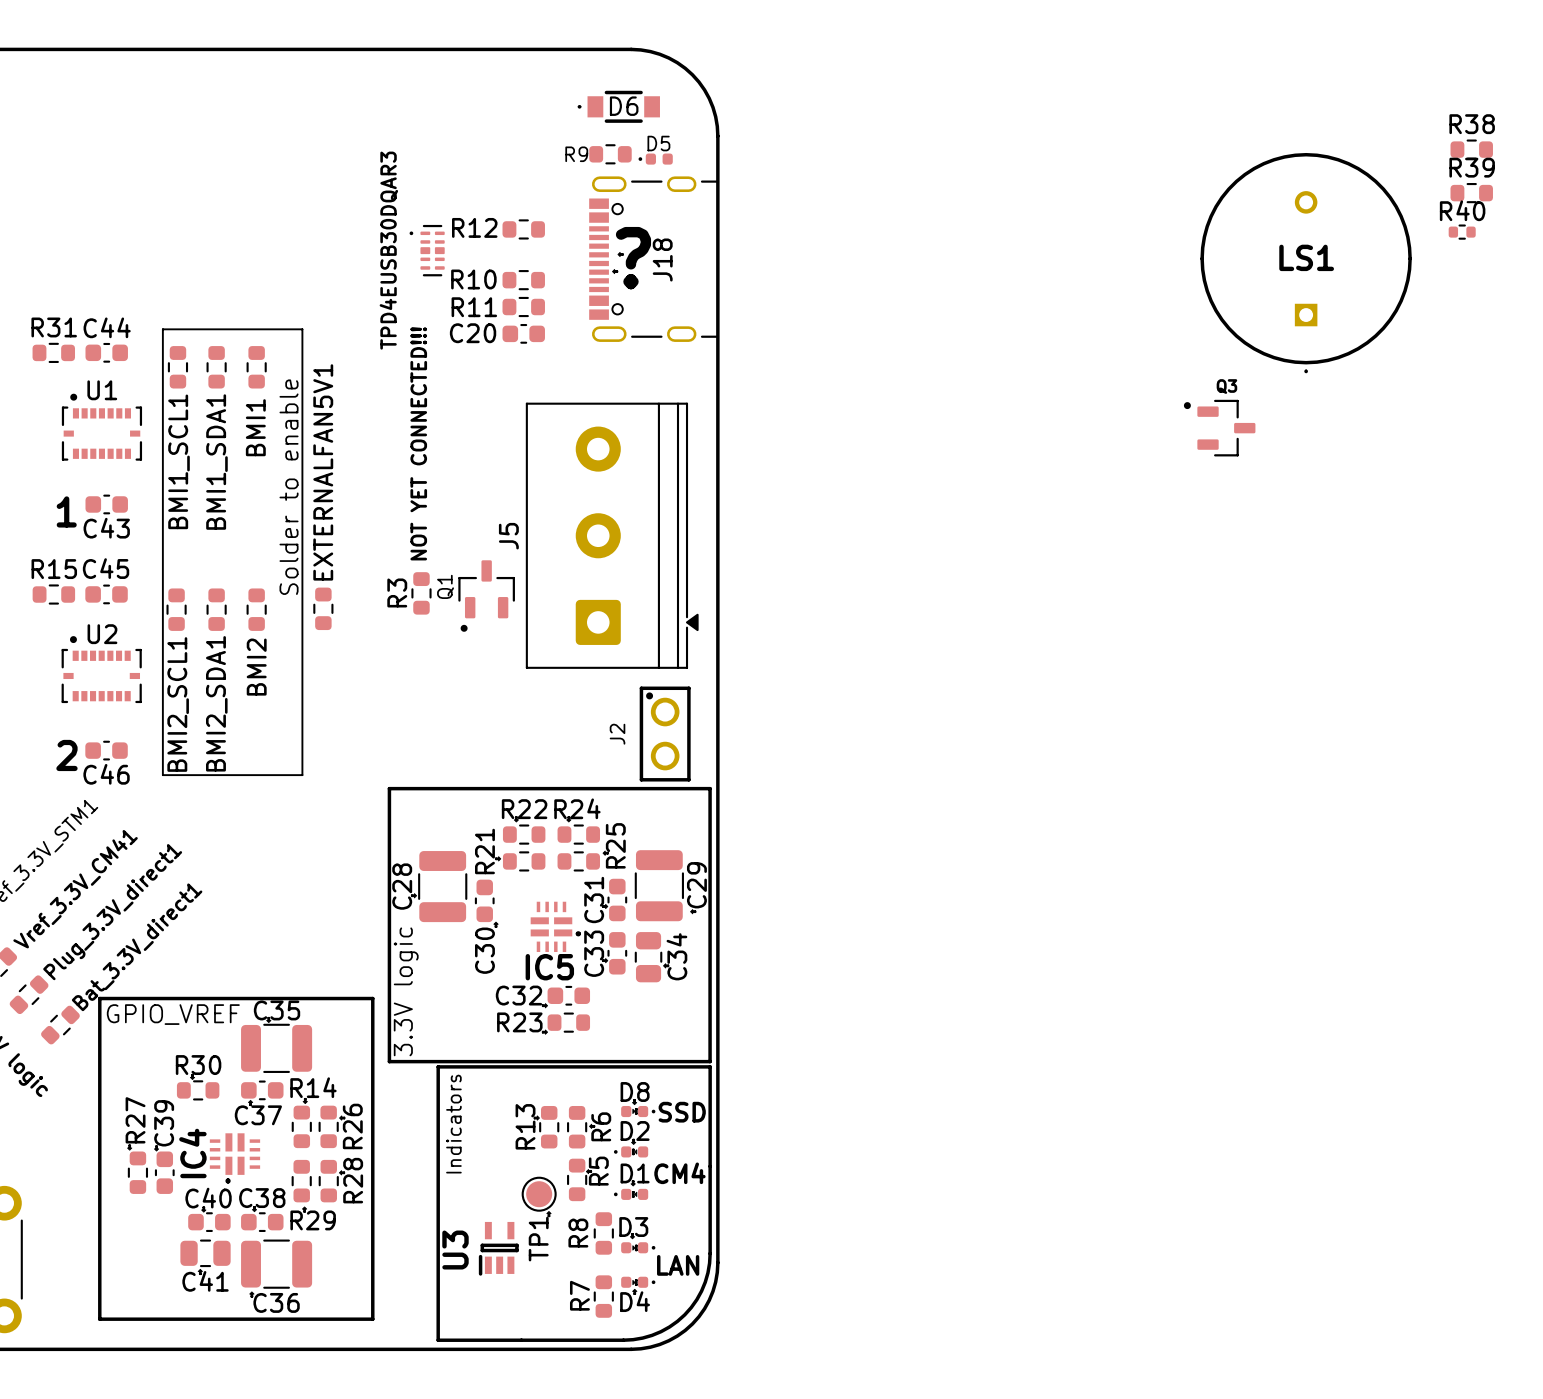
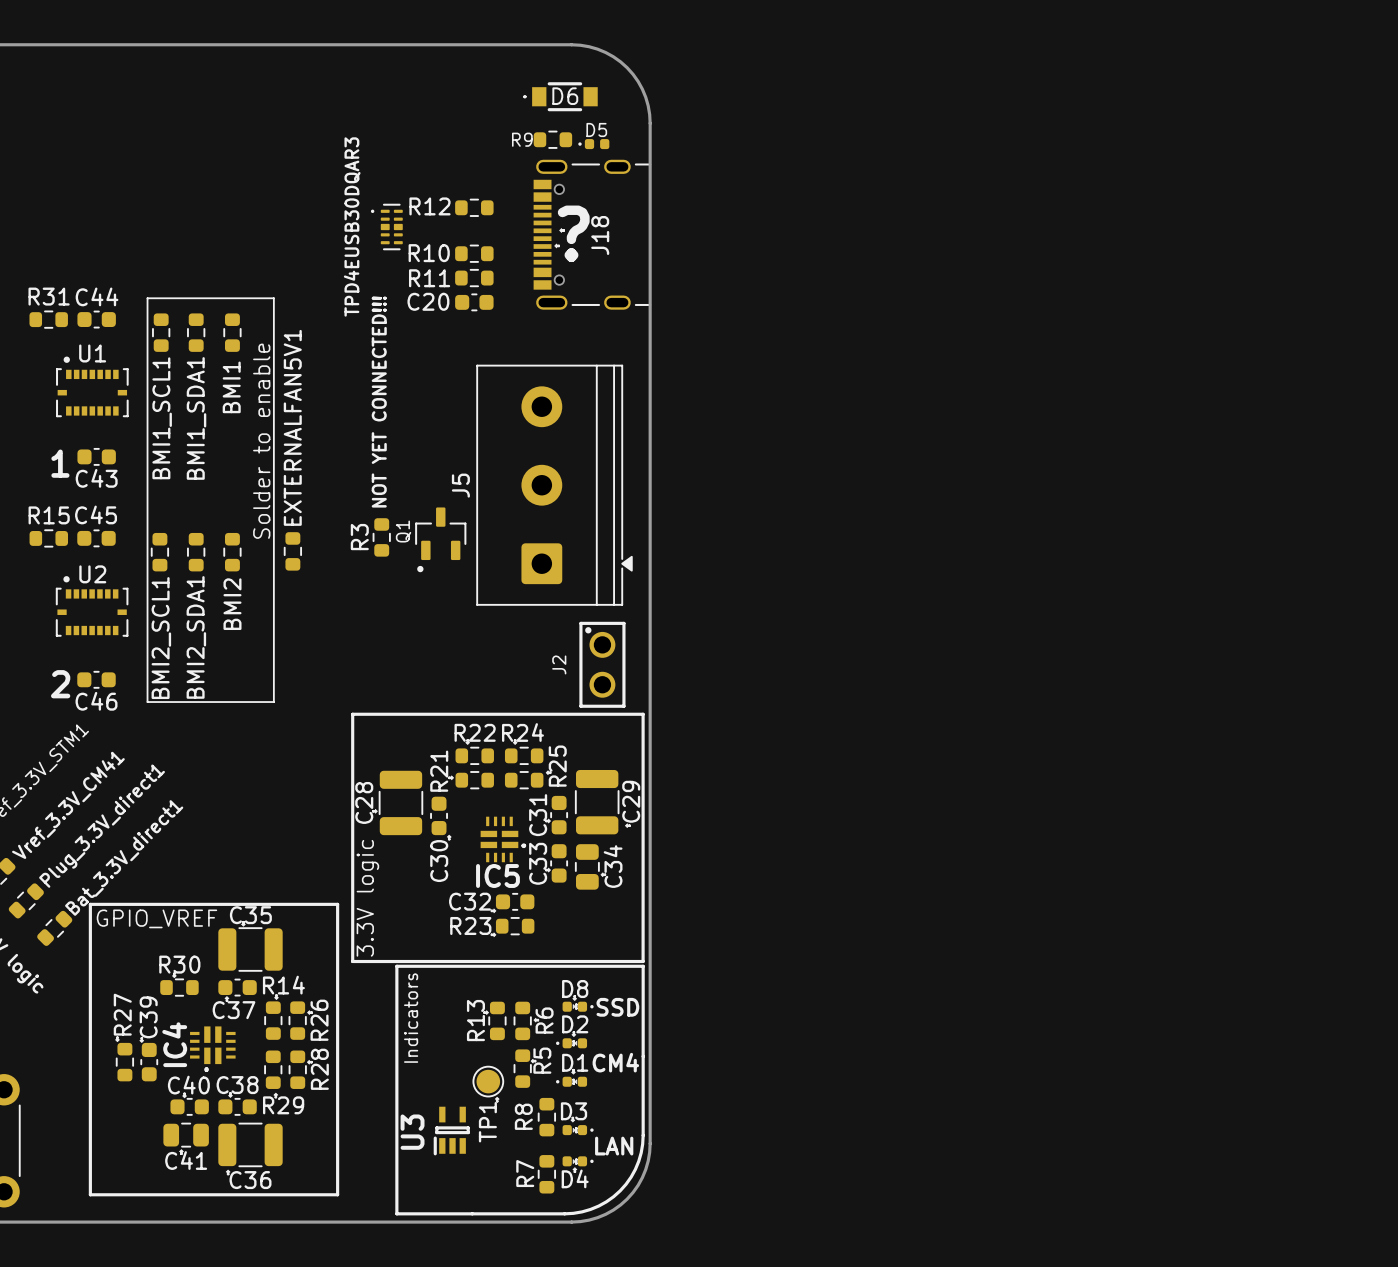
R38: (1471, 149) -> none
R39: (1471, 193) -> none
R40: (1462, 232) -> none
LS1: (1306, 263) -> none
Q3: (1219, 428) -> none

